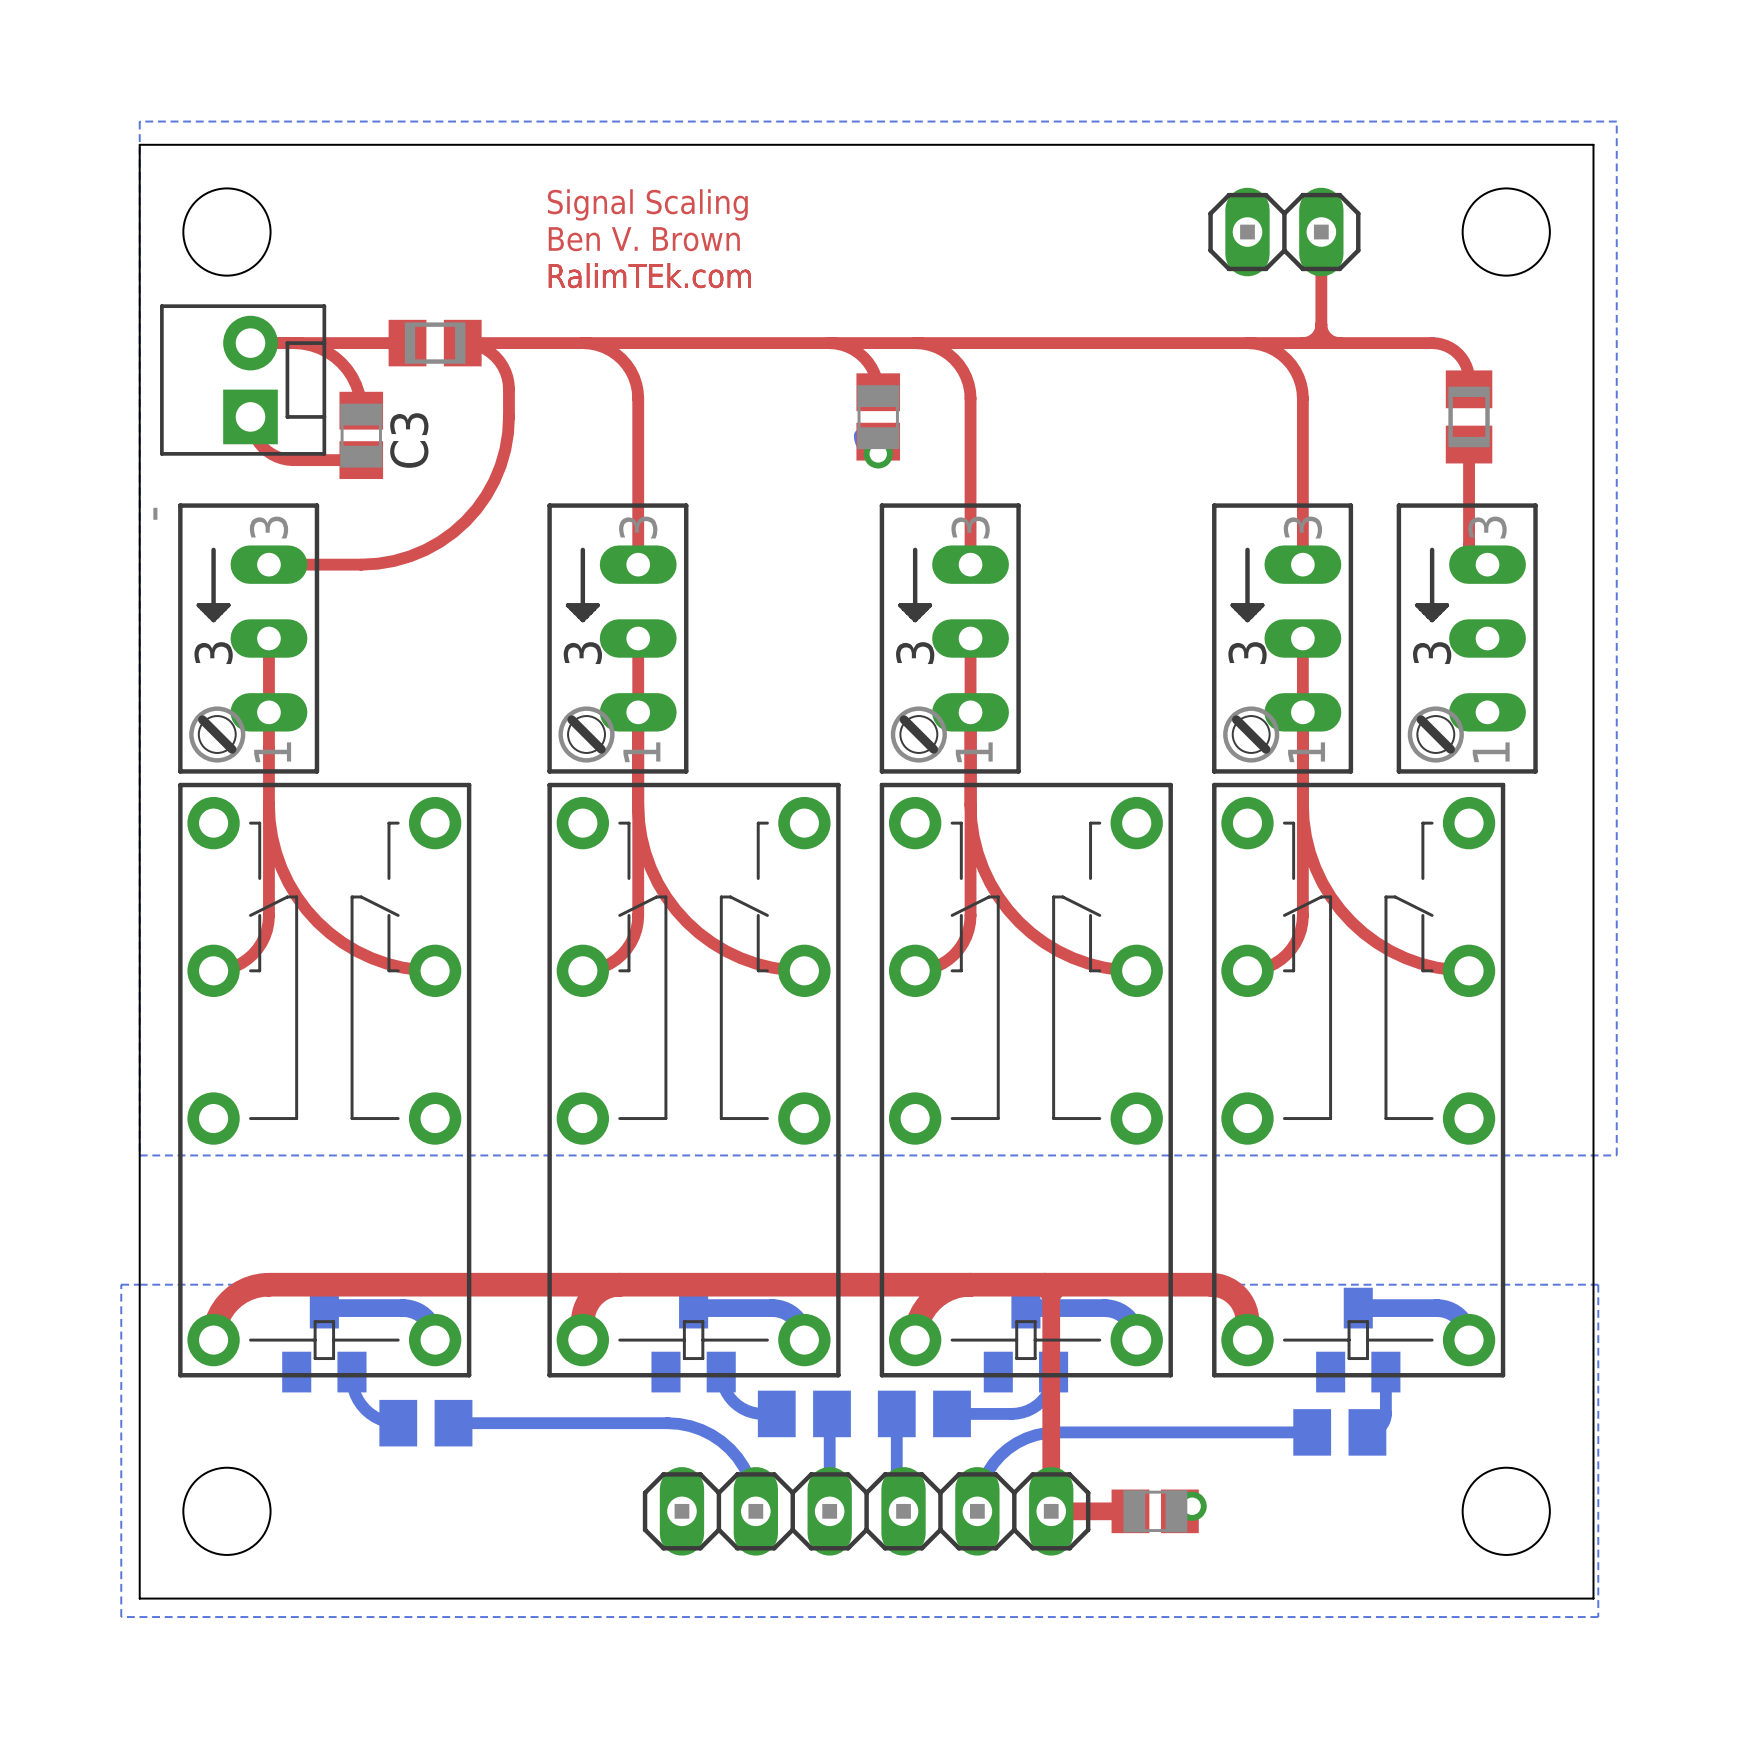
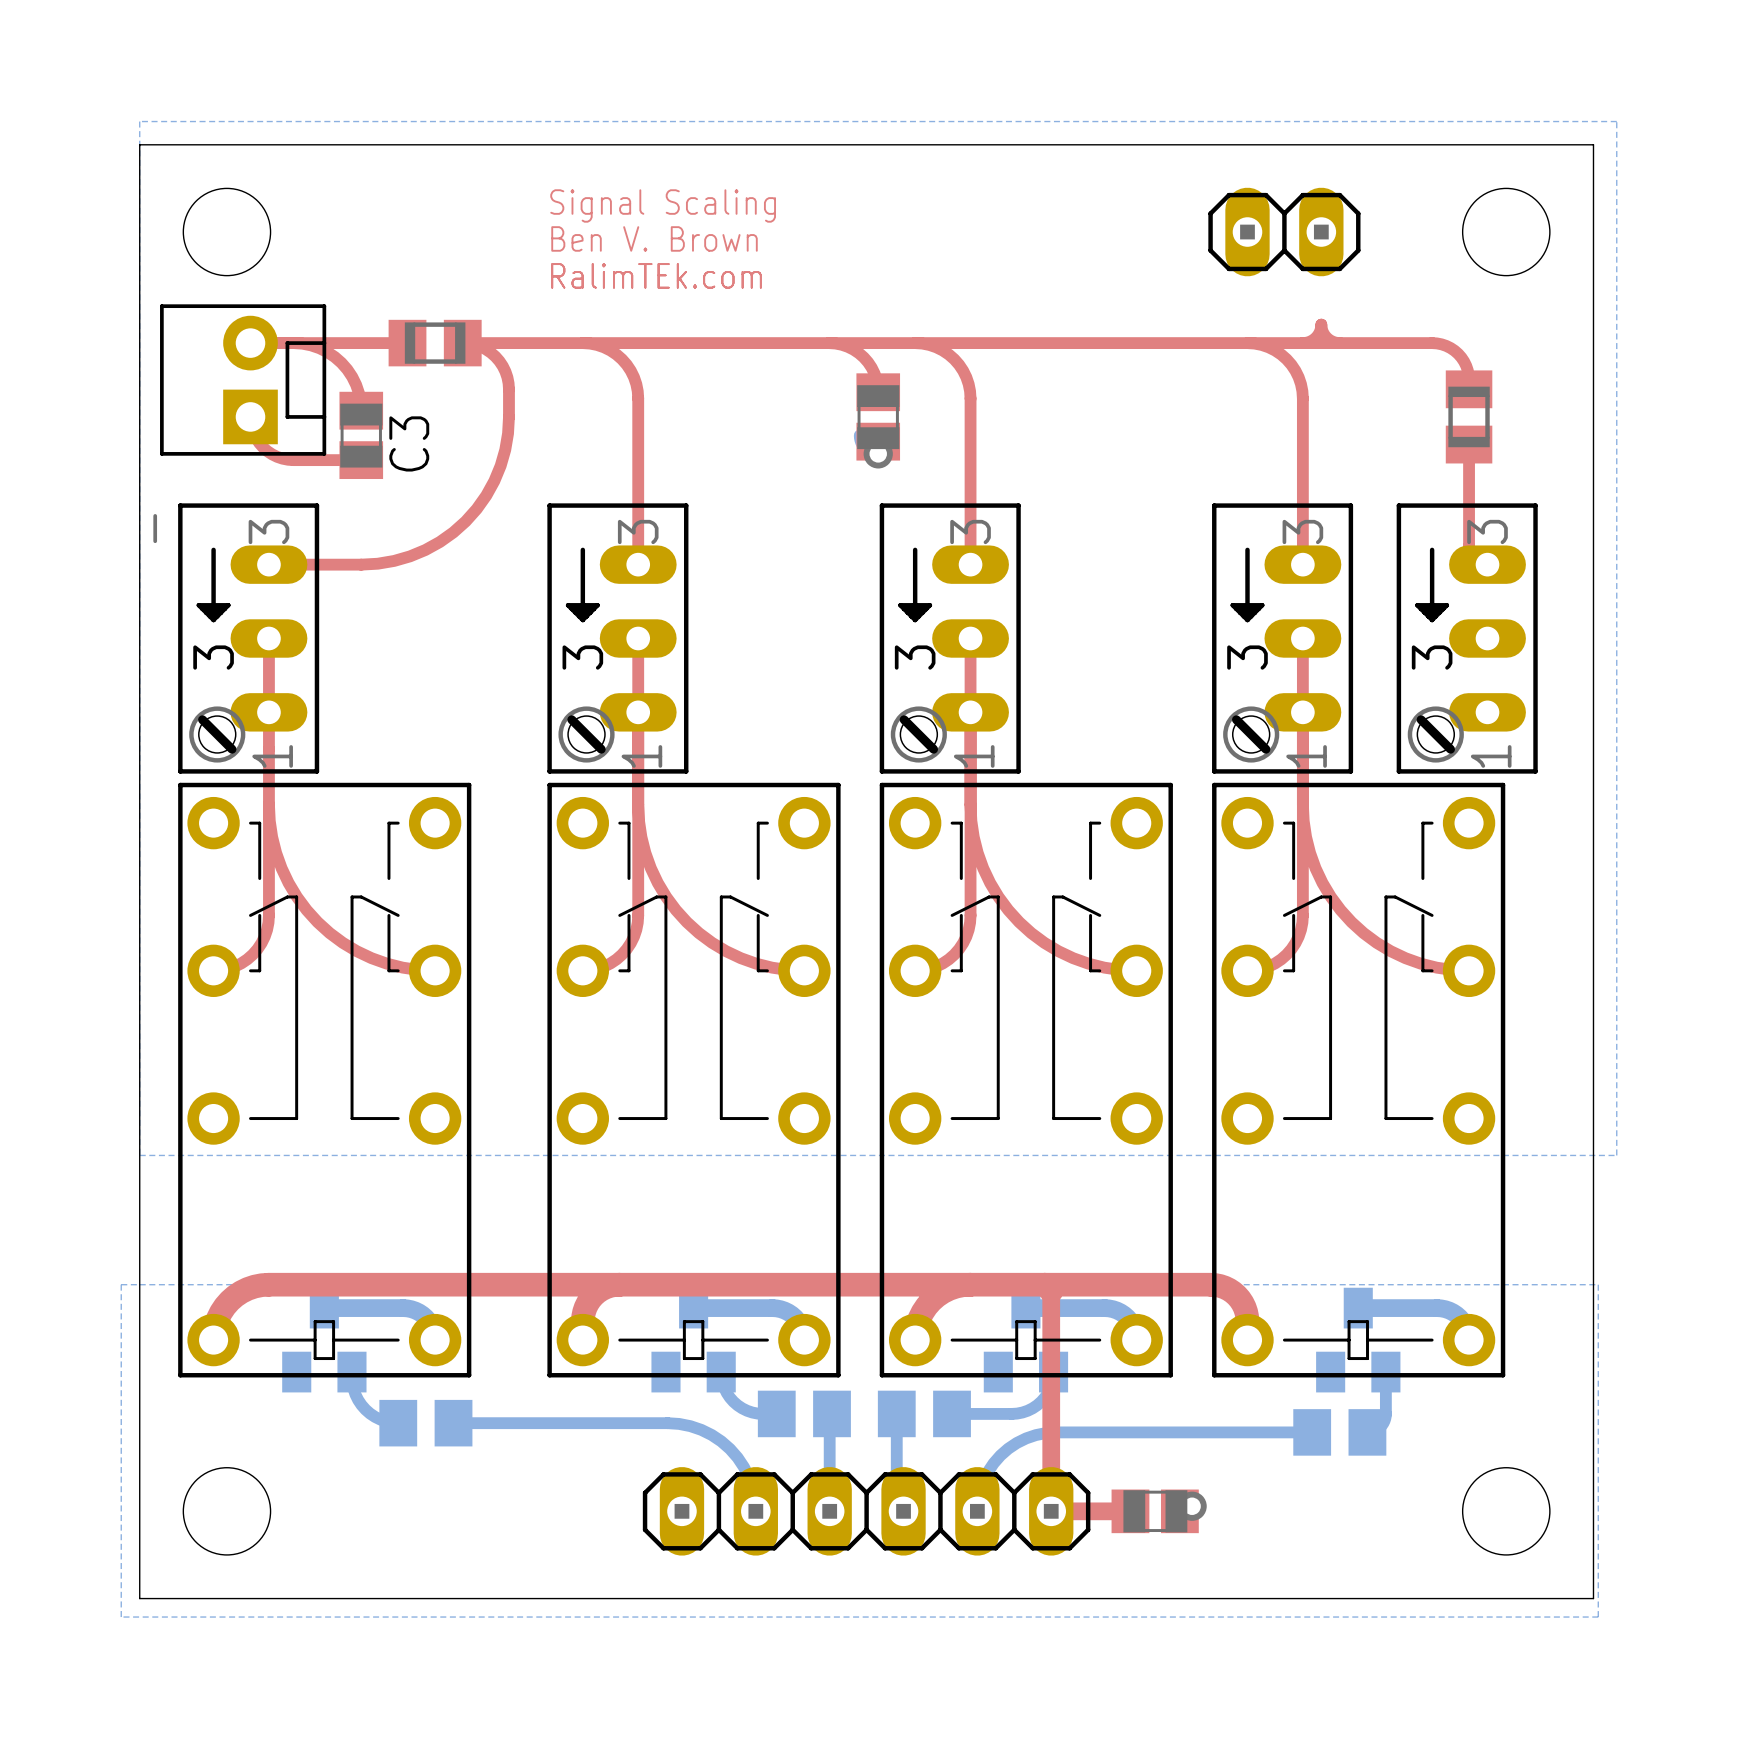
top track: (1321, 232) (1321, 324) -> none

